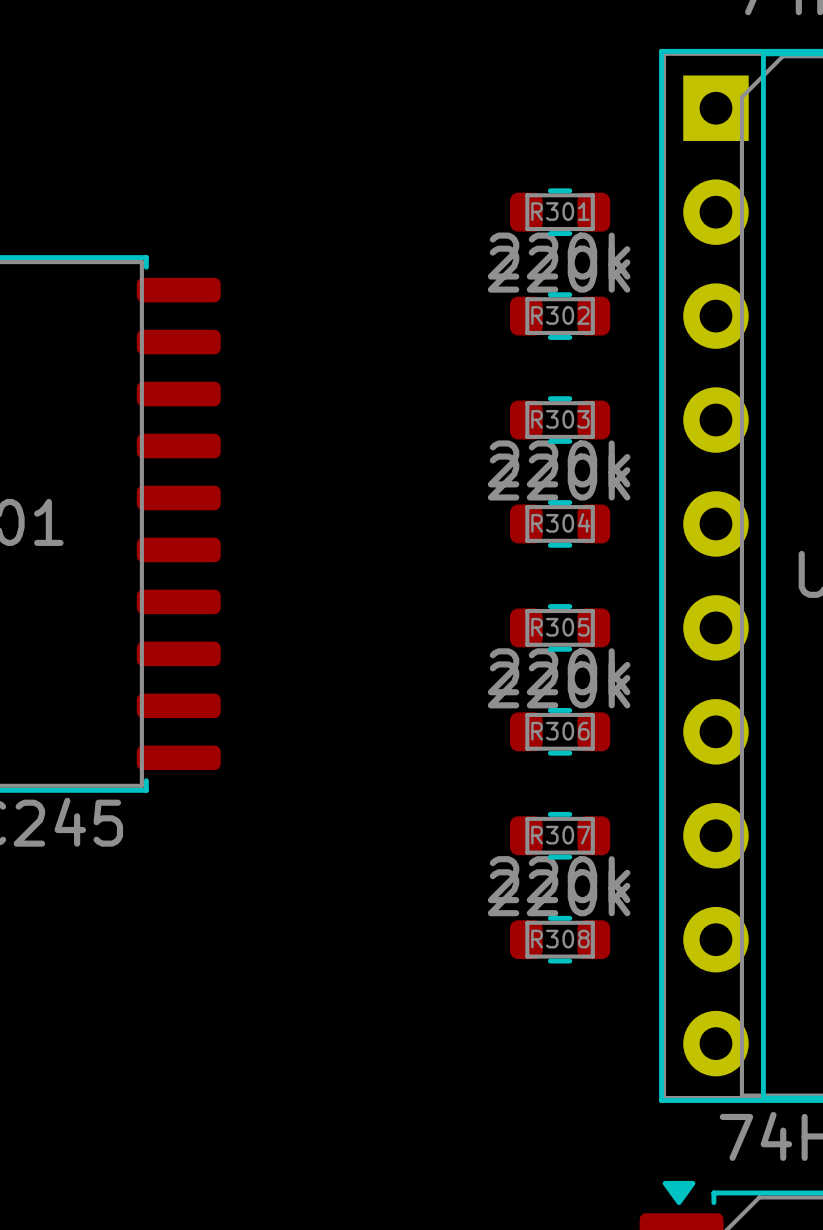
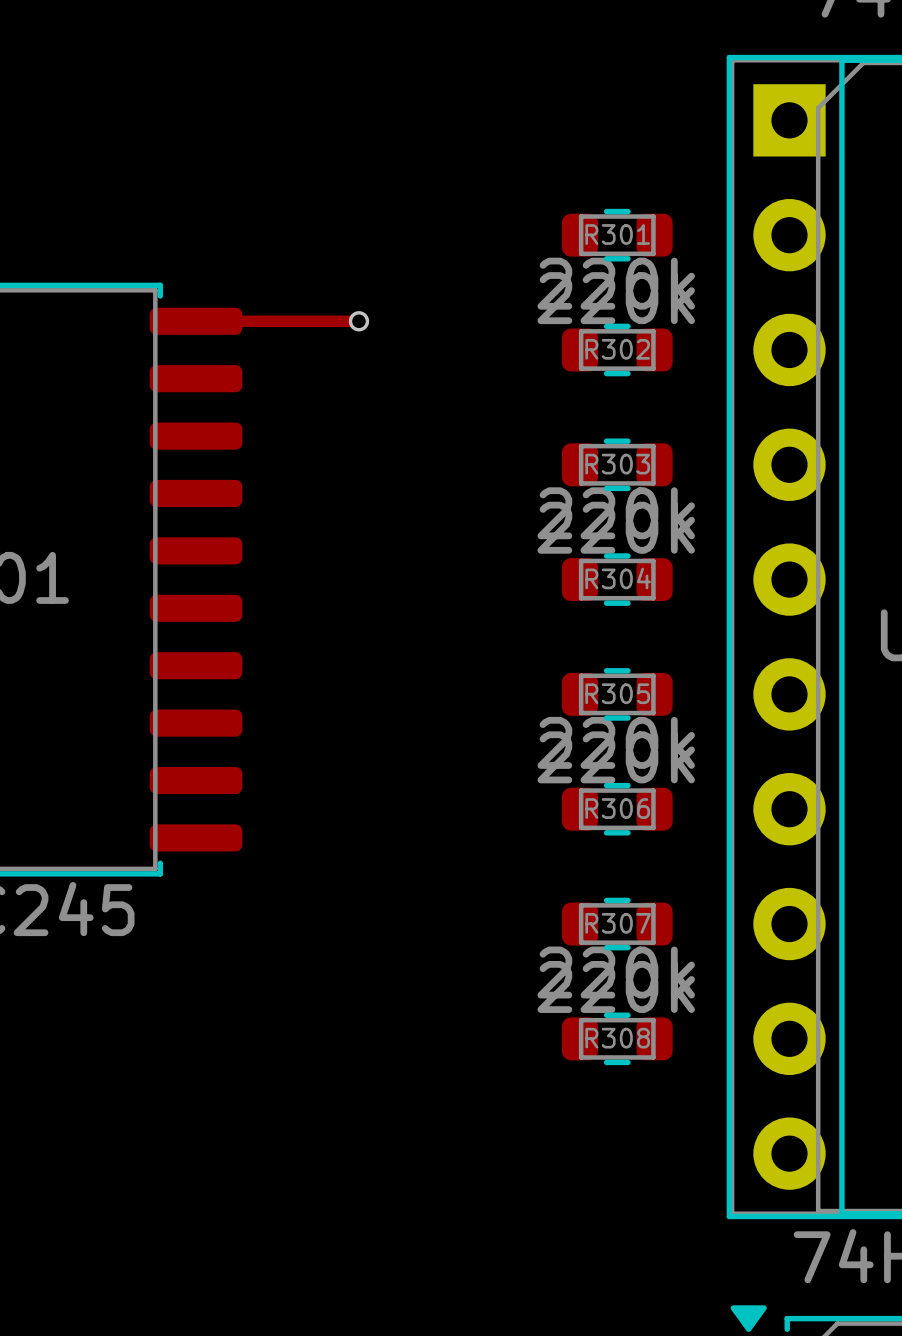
track: none -> (196, 321) (358, 321)
via: none -> (358, 321)

